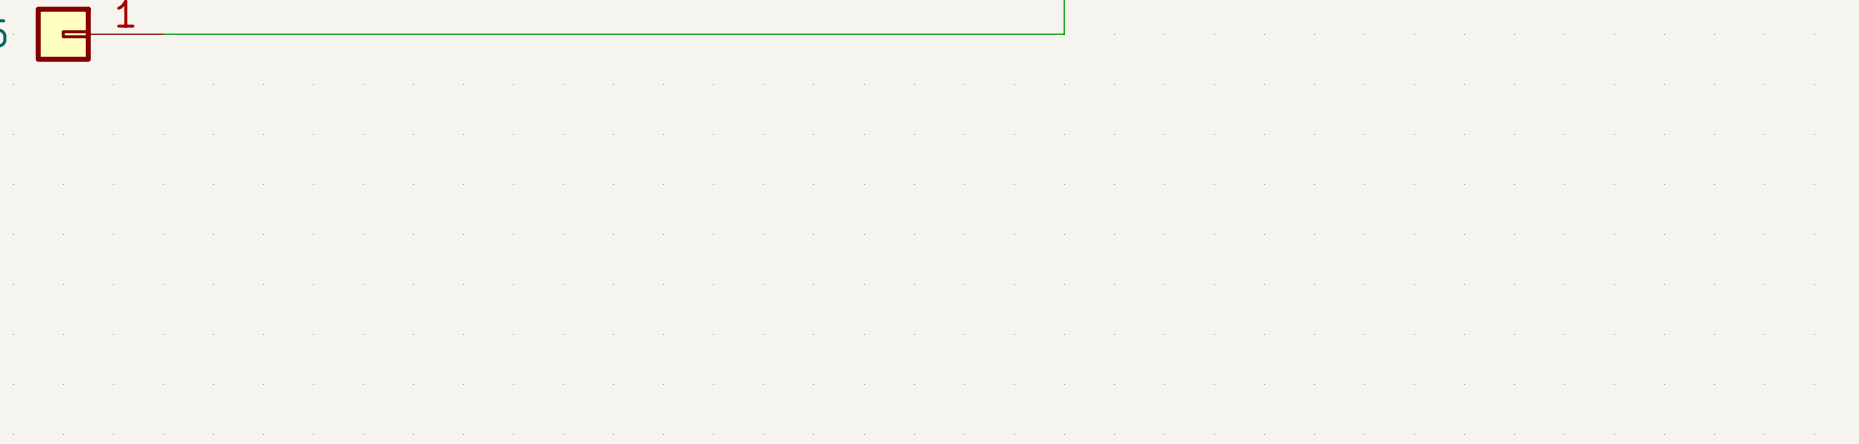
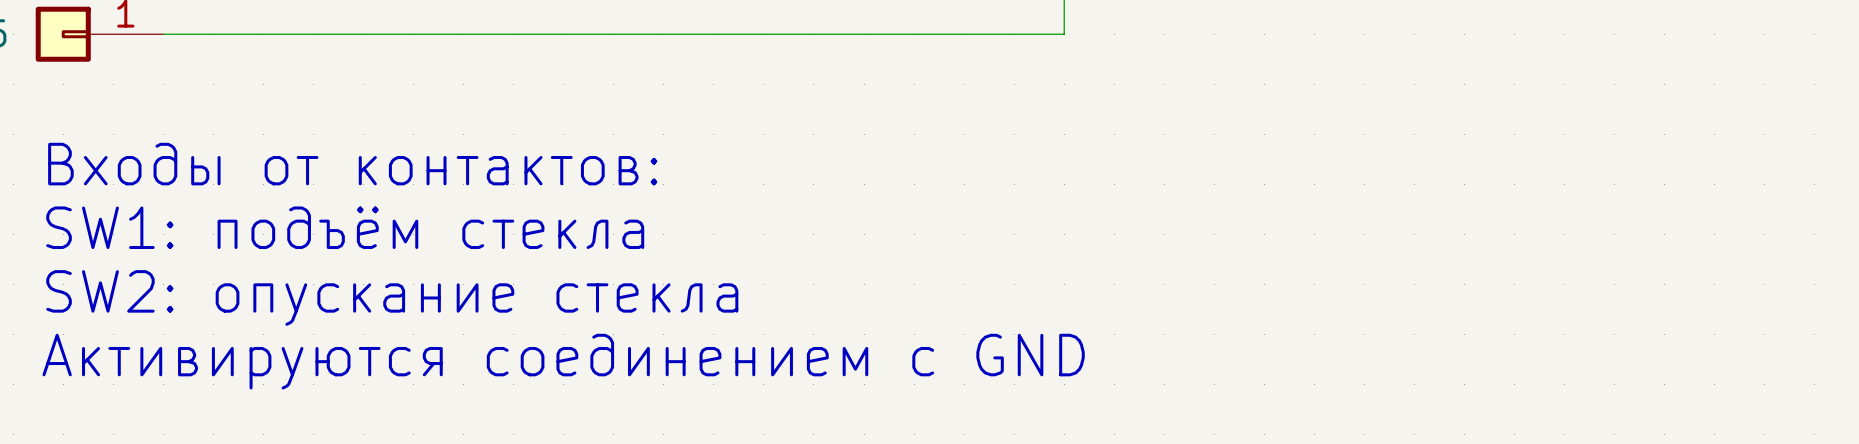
text: none -> Входы от контактов: (352, 164)
text: none -> SW1: подъём стекла (345, 227)
text: none -> SW2: опускание стекла (392, 297)
text: none -> Активируются соединением с GND (563, 361)

